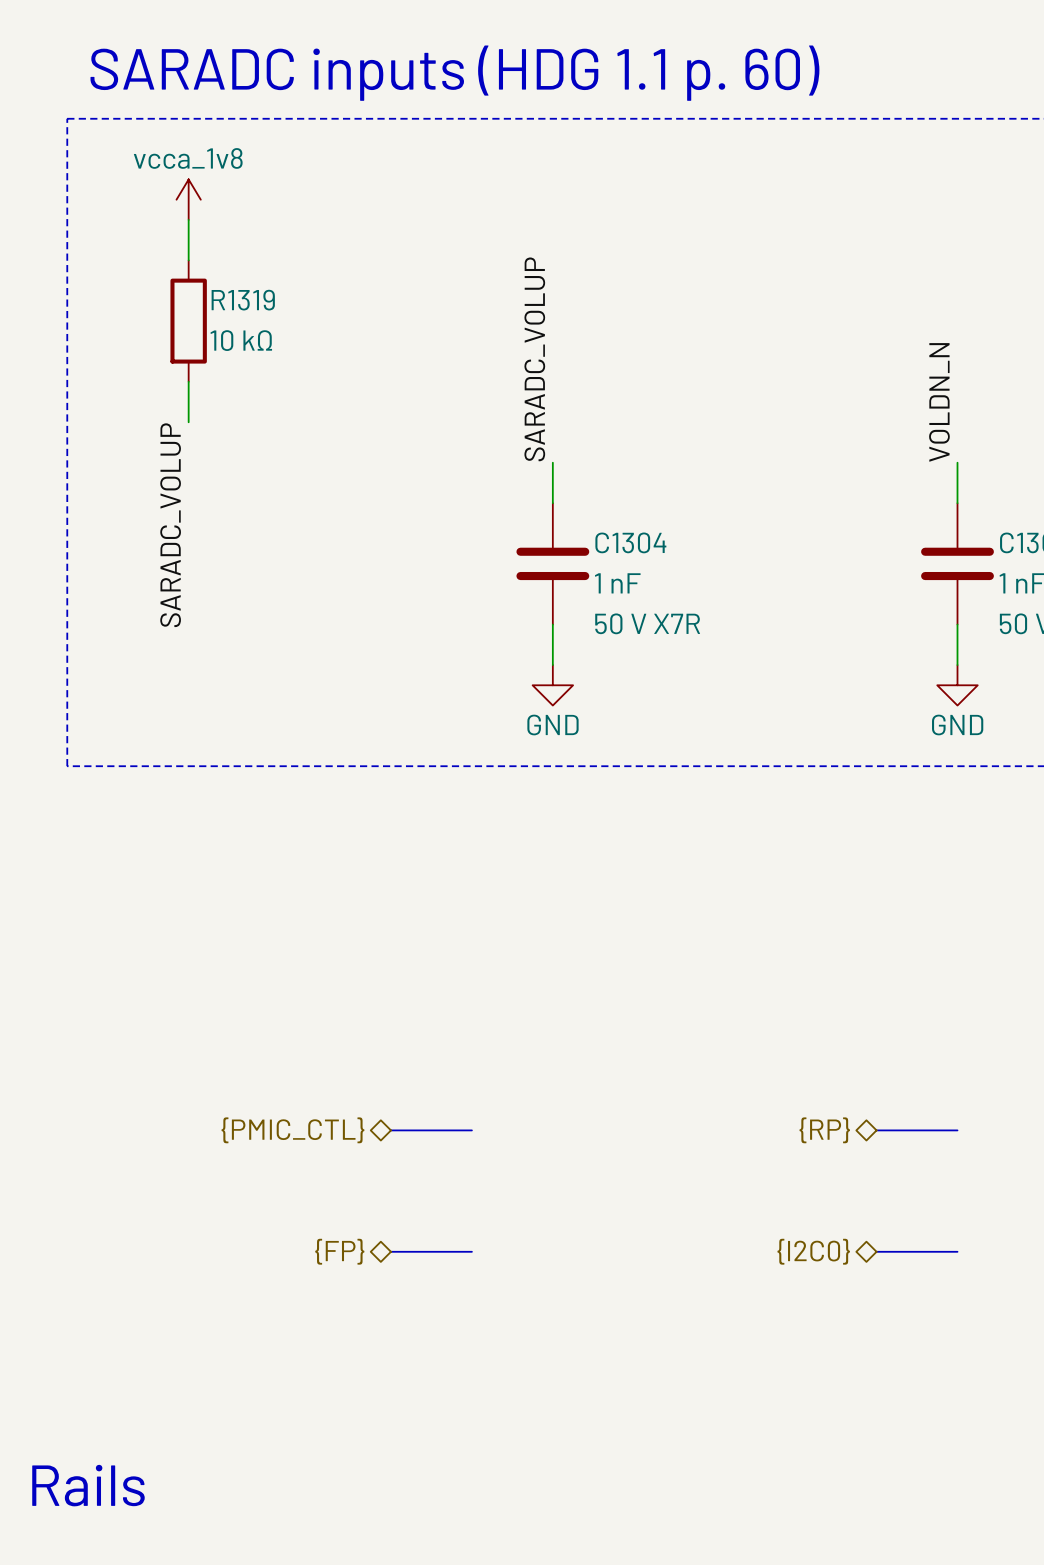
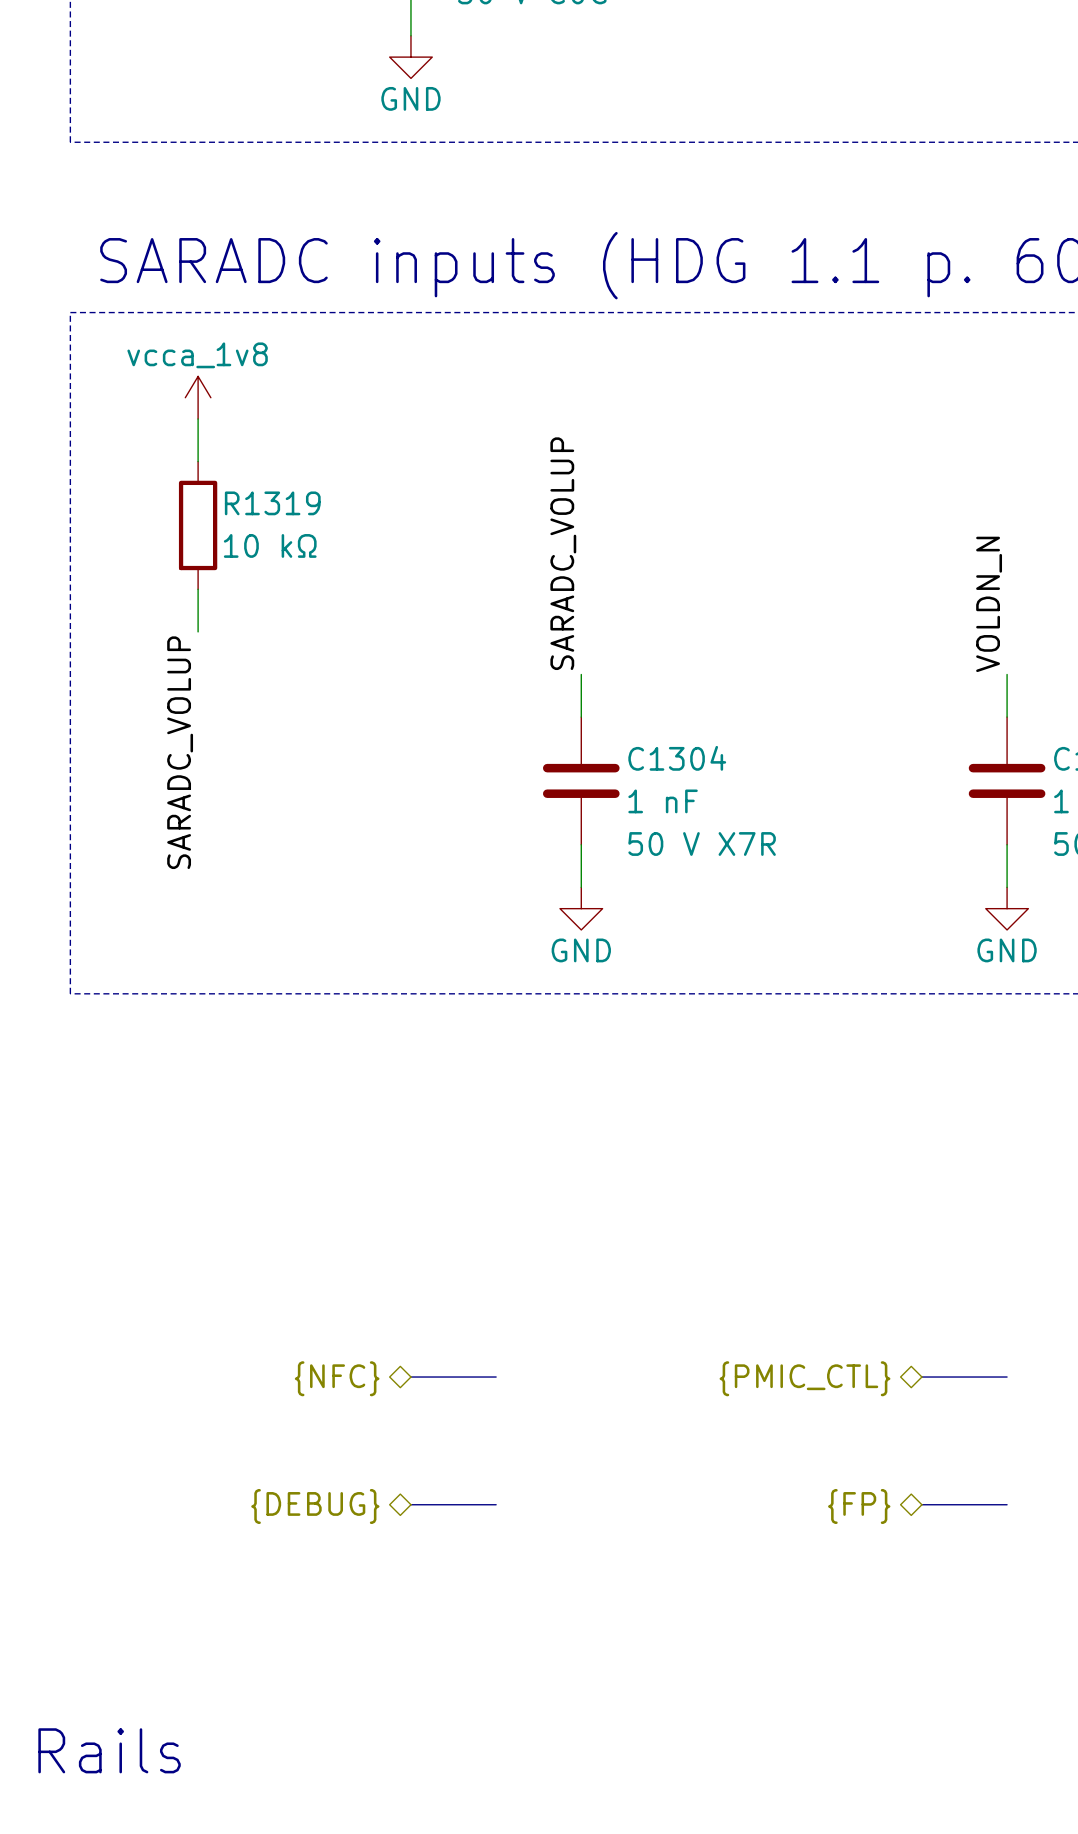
hierarchical label: {PMIC_CTL} (292, 1130) -> {NFC} (337, 1378)
hierarchical label: {RP} (824, 1130) -> {PMIC_CTL} (805, 1378)
hierarchical label: {FP} (339, 1251) -> {DEBUG} (315, 1506)
hierarchical label: {I2C0} (813, 1251) -> {FP} (859, 1506)

